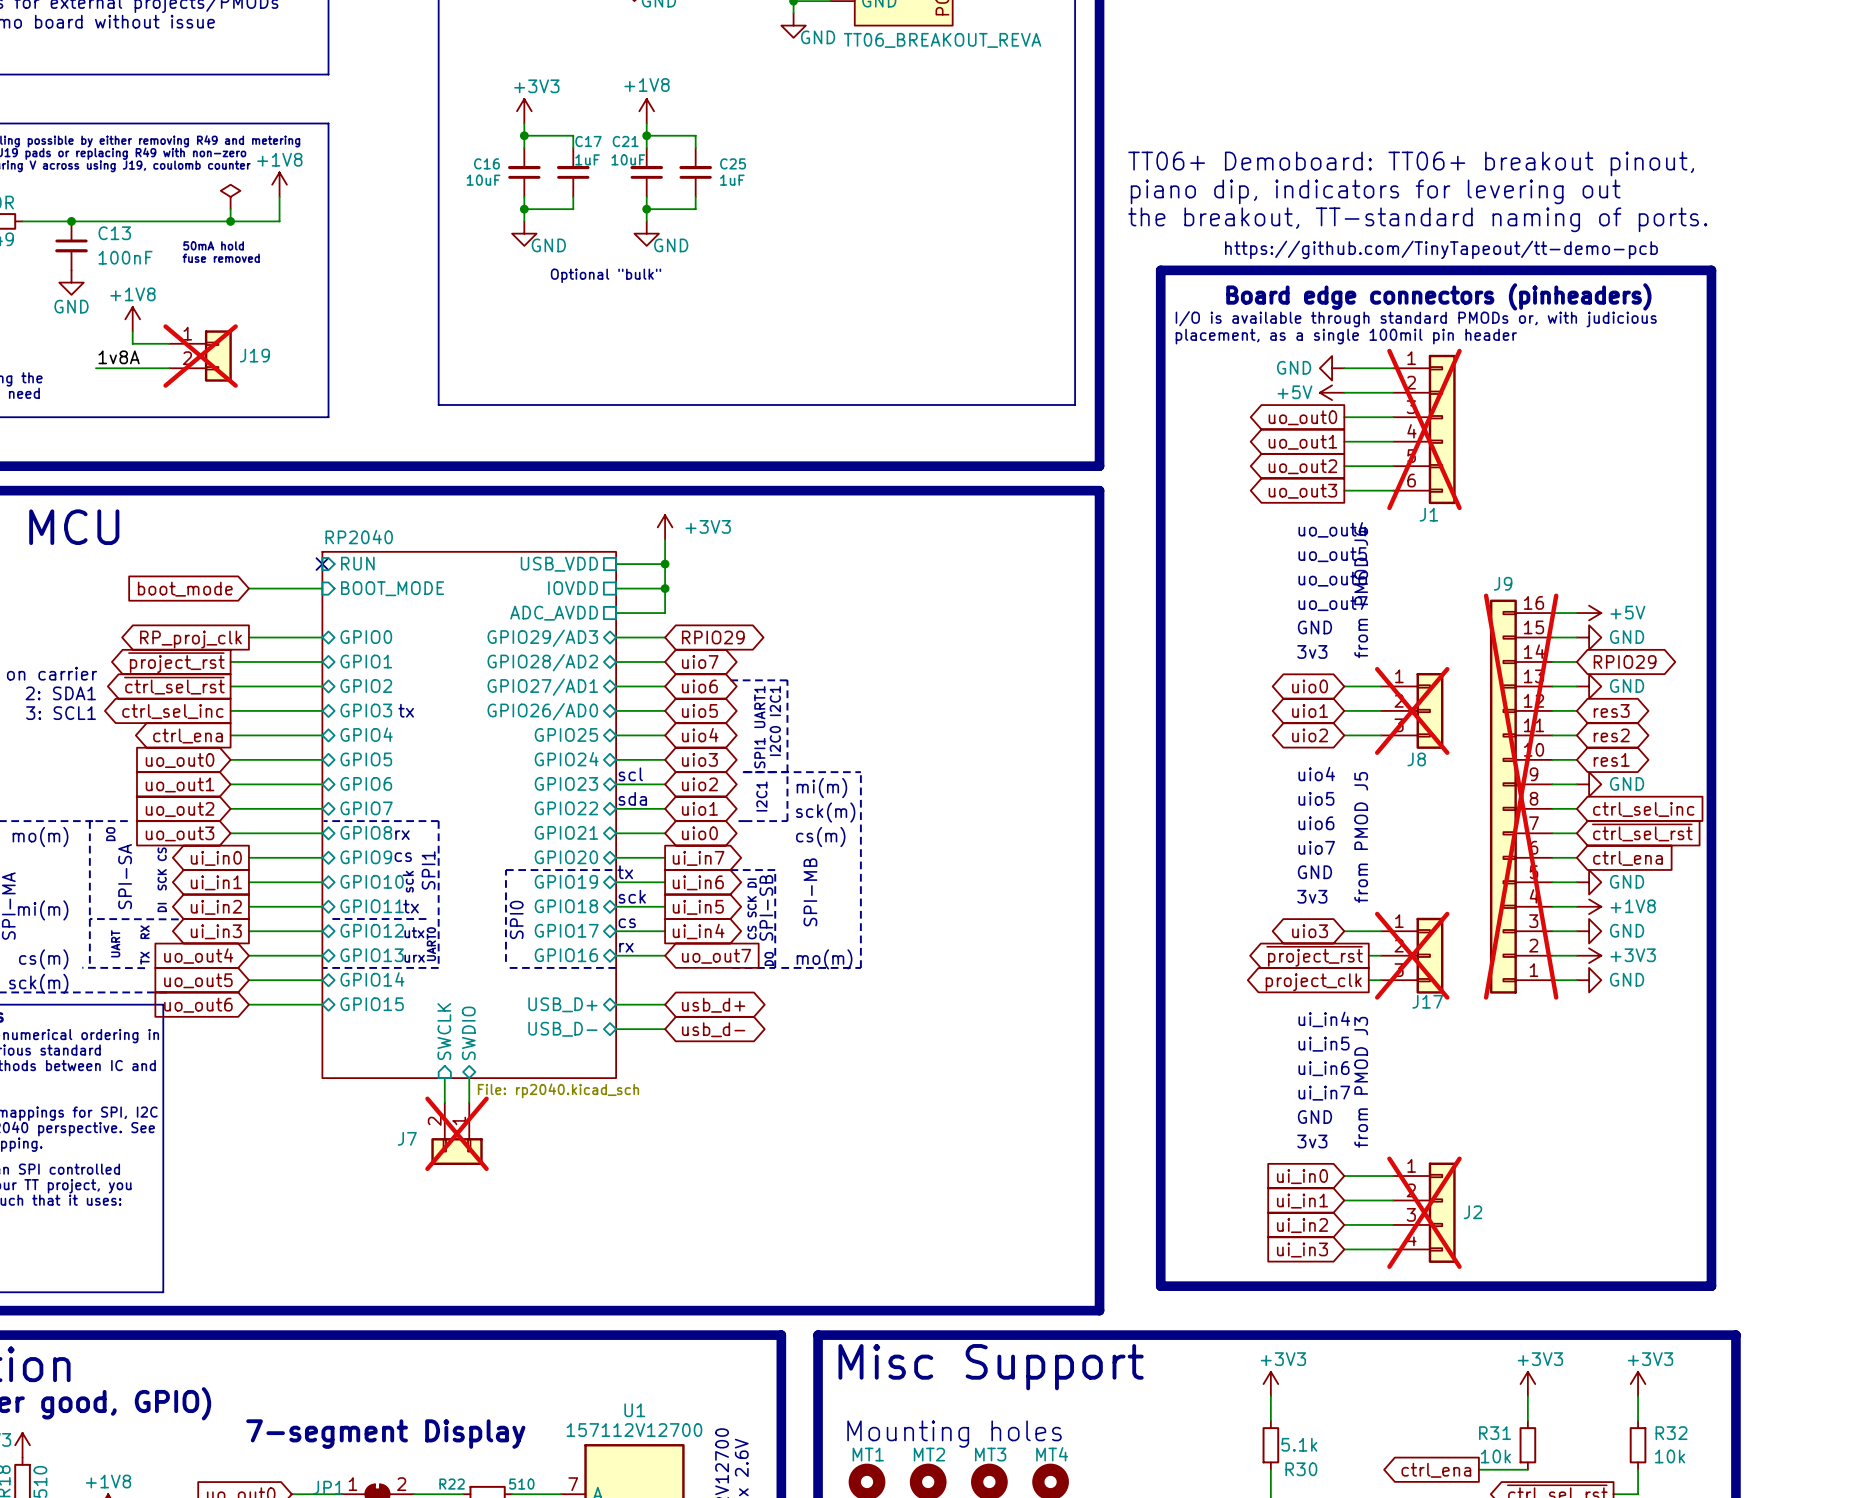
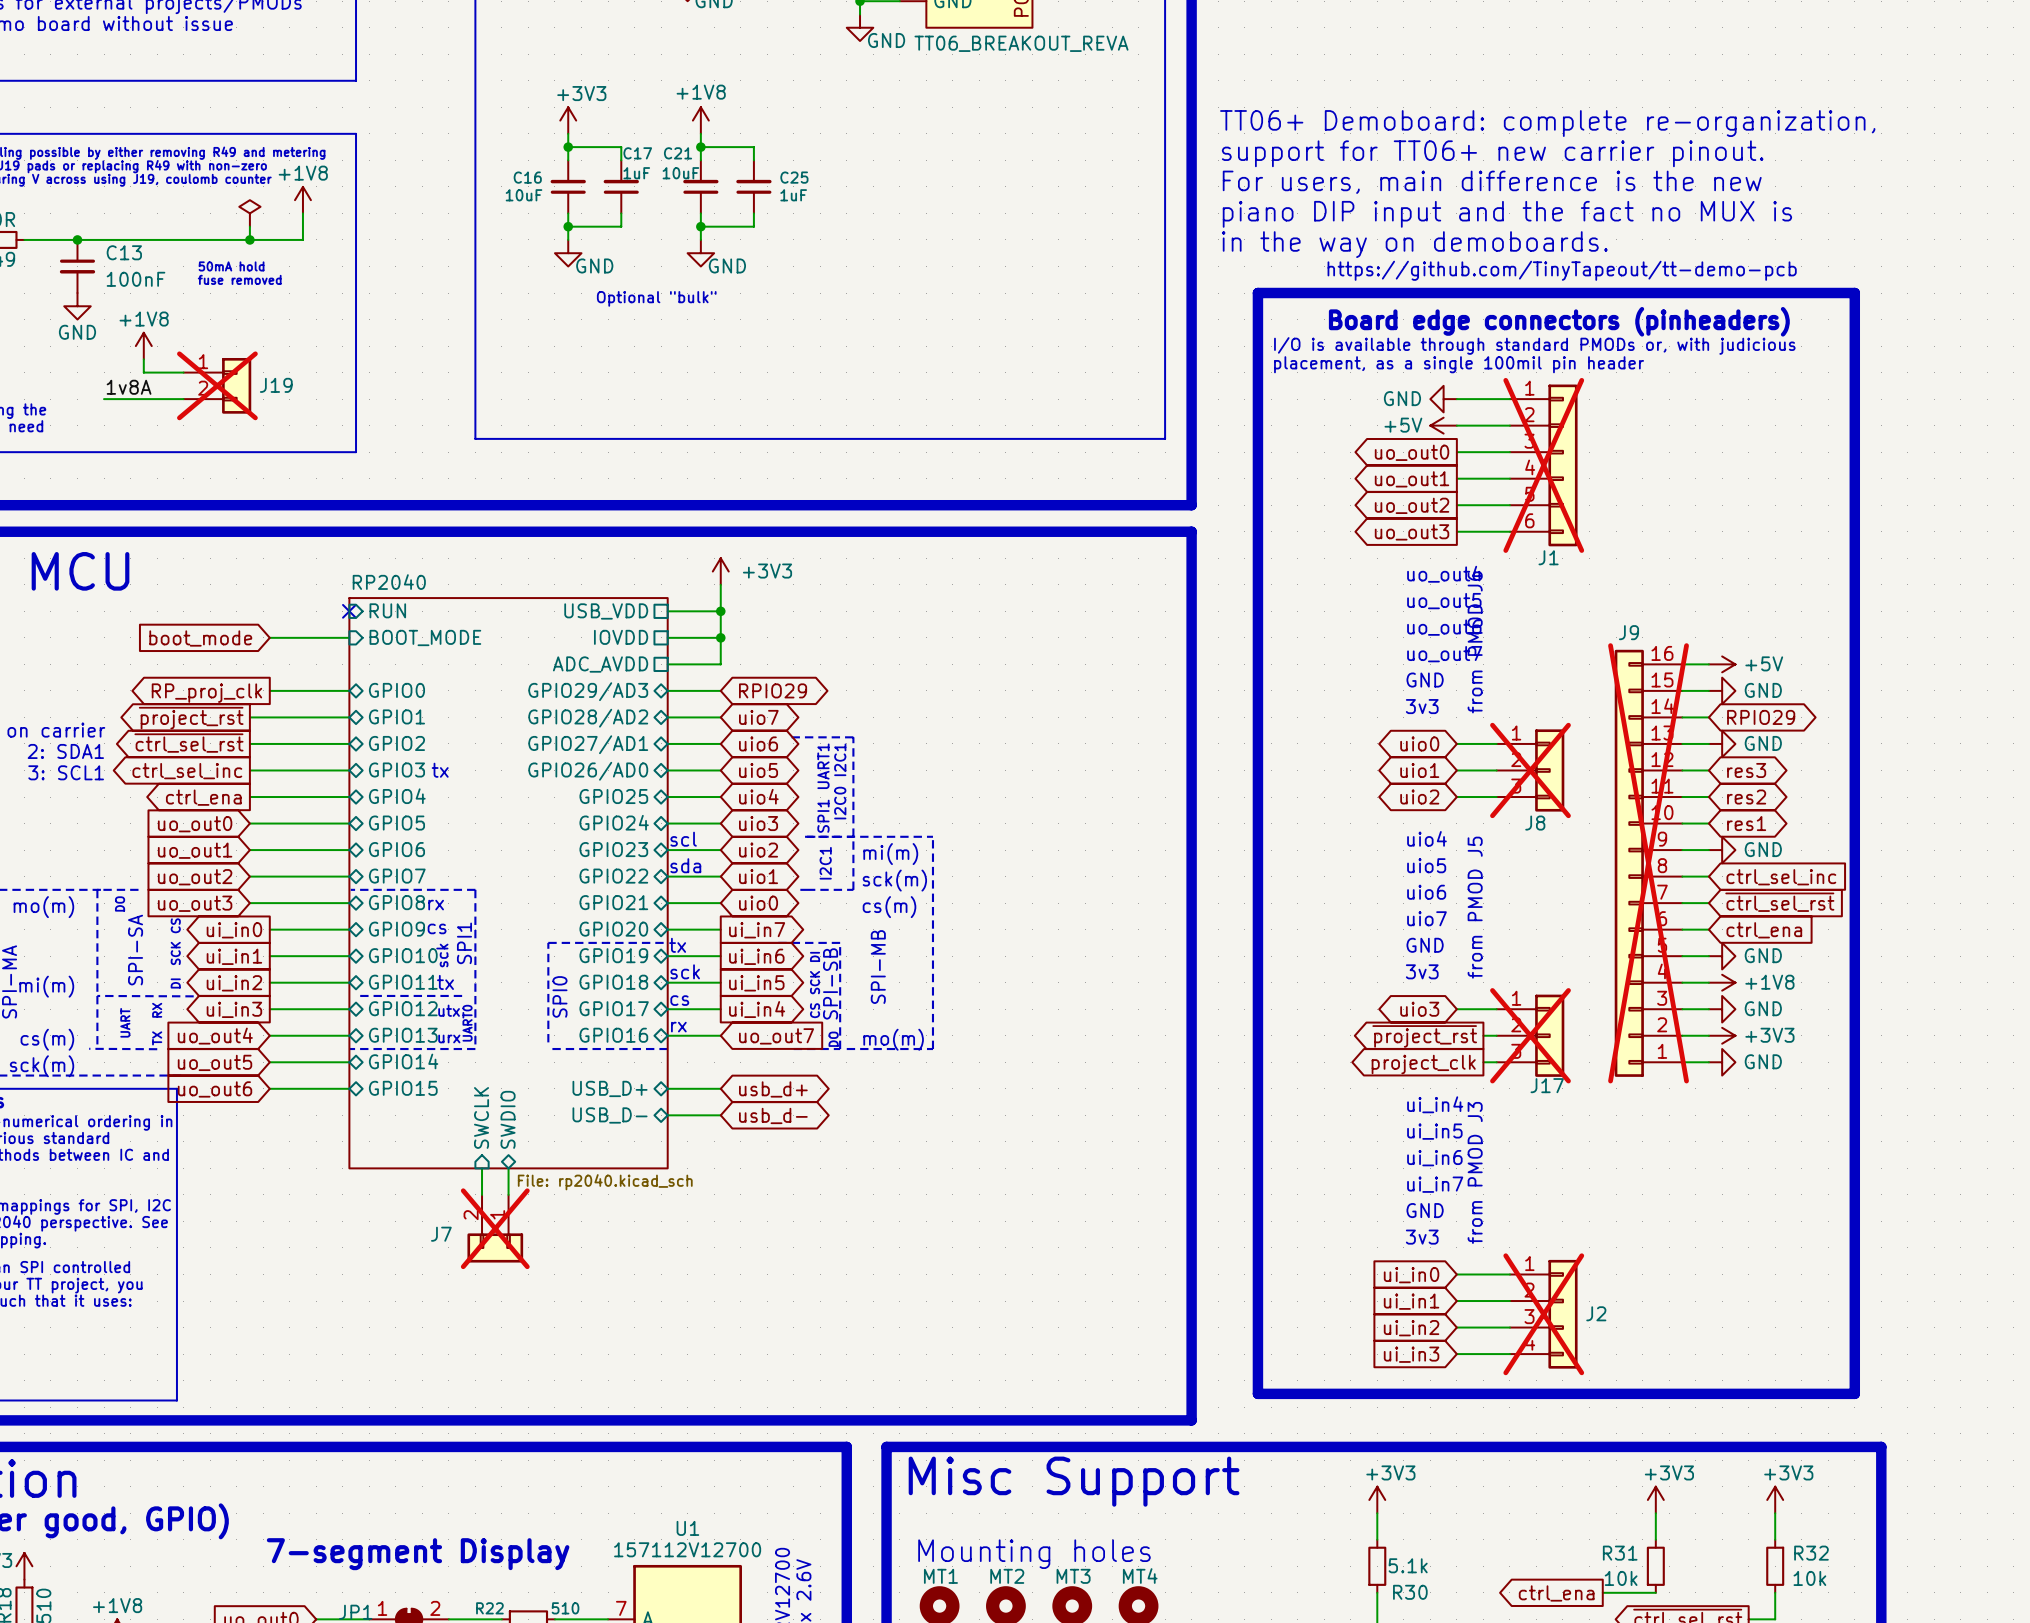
text: none -> TT06+ Demoboard: complete re-organization, (1547, 123)
text: none -> support for TT06+ new carrier pinout. (1492, 153)
text: TT06+ Demoboard: TT06+ breakout pinout, (1411, 163) -> For users, main difference is the new (1492, 182)
text: piano dip, indicators for levering out (1375, 191) -> piano DIP input and the fact no MUX is (1507, 214)
text: the breakout, TT-standard naming of ports. (1417, 219) -> in the way on demoboards. (1414, 244)

